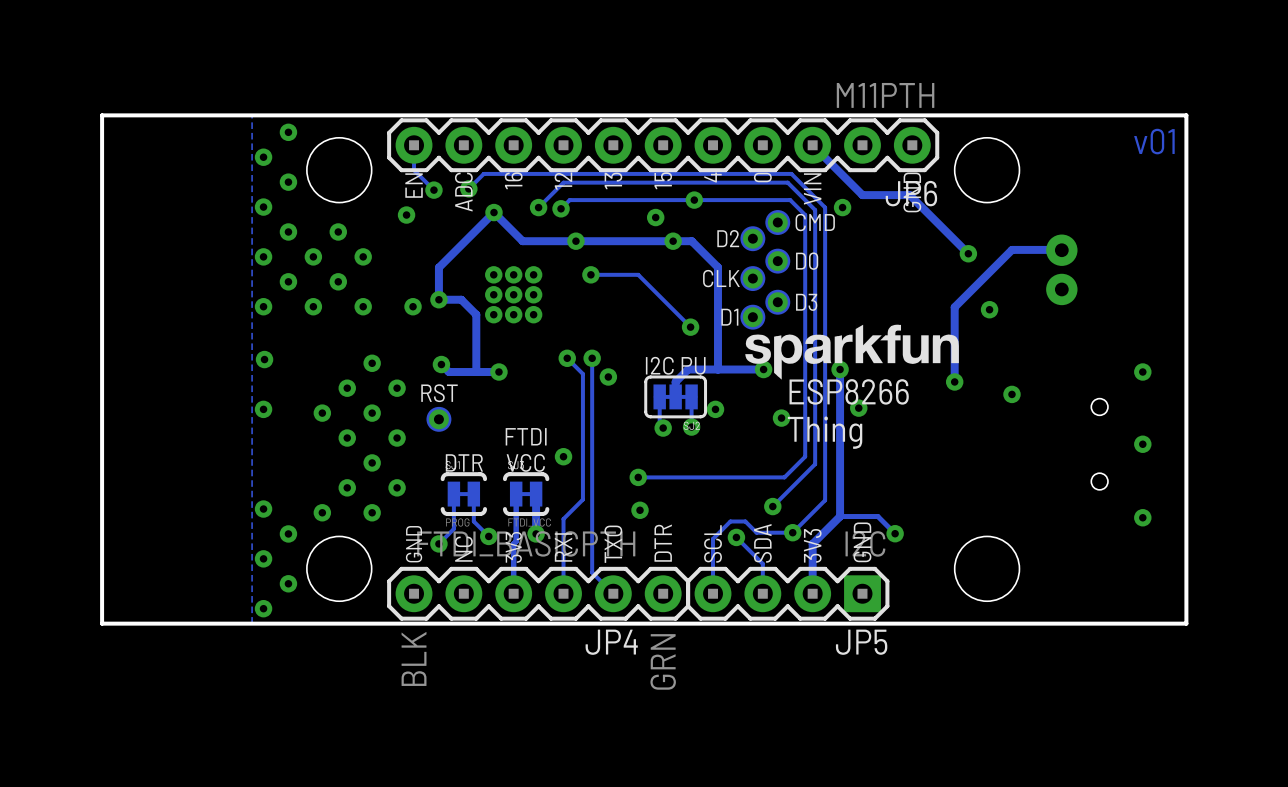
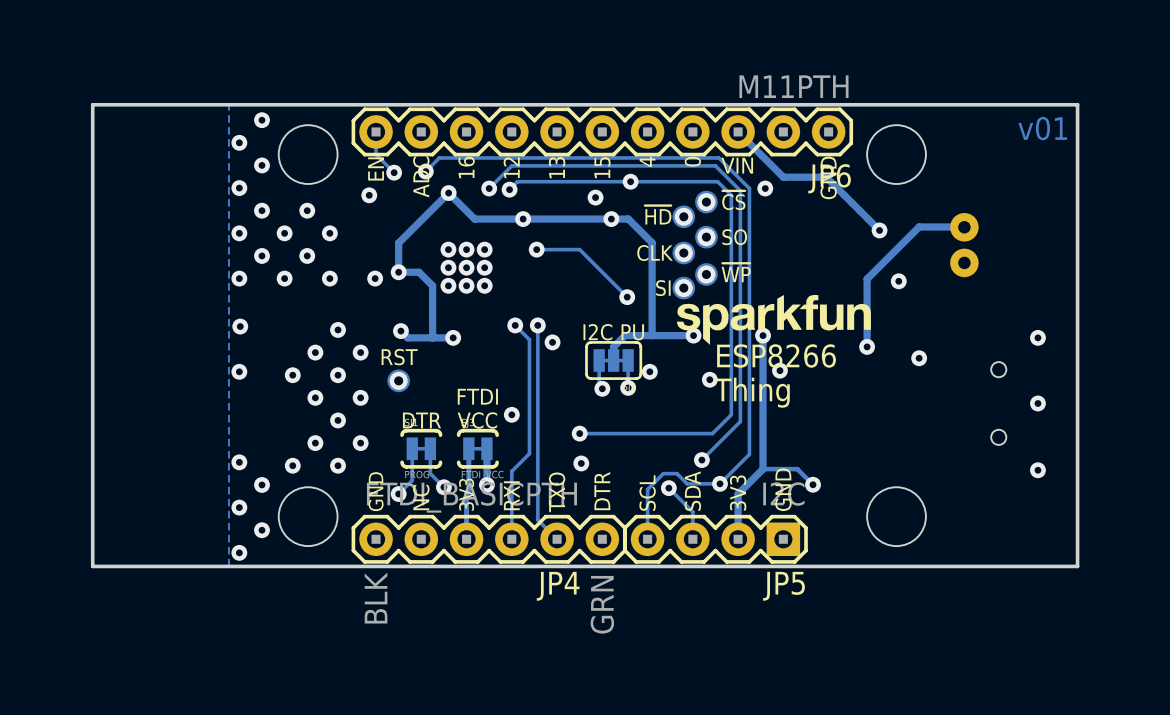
text rotation: 0° (812, 188) -> 90° clockwise (737, 165)
text: CMD (815, 222) -> ~{CS} (733, 200)
text: D2 (728, 238) -> ~{HD} (658, 215)
text: D0 (807, 261) -> SO (734, 237)
text: D3 (806, 302) -> ~{WP} (736, 272)
text: D1 (729, 317) -> SI (663, 288)

